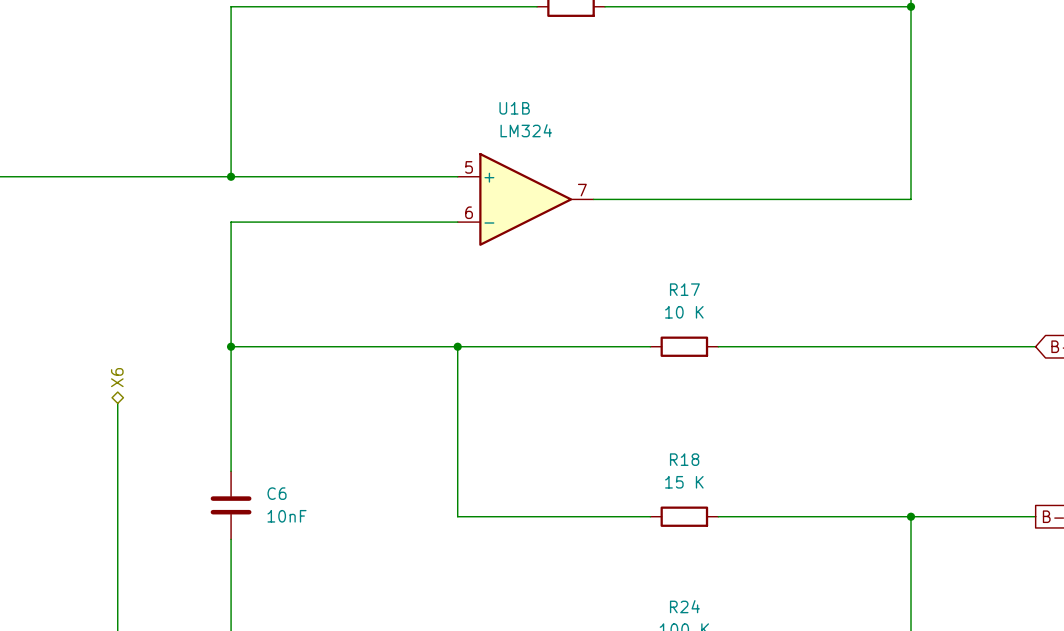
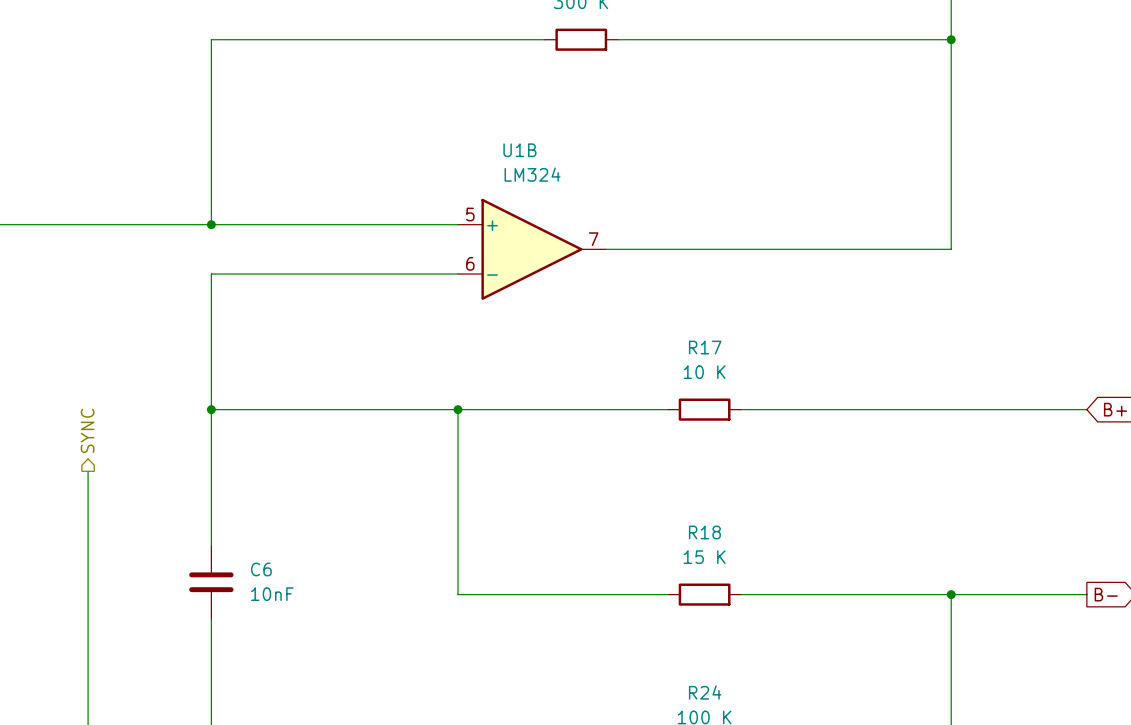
hierarchical label shape: bidirectional (117, 377) -> output (87, 430)
hierarchical label: X6 (117, 377) -> SYNC (87, 430)

